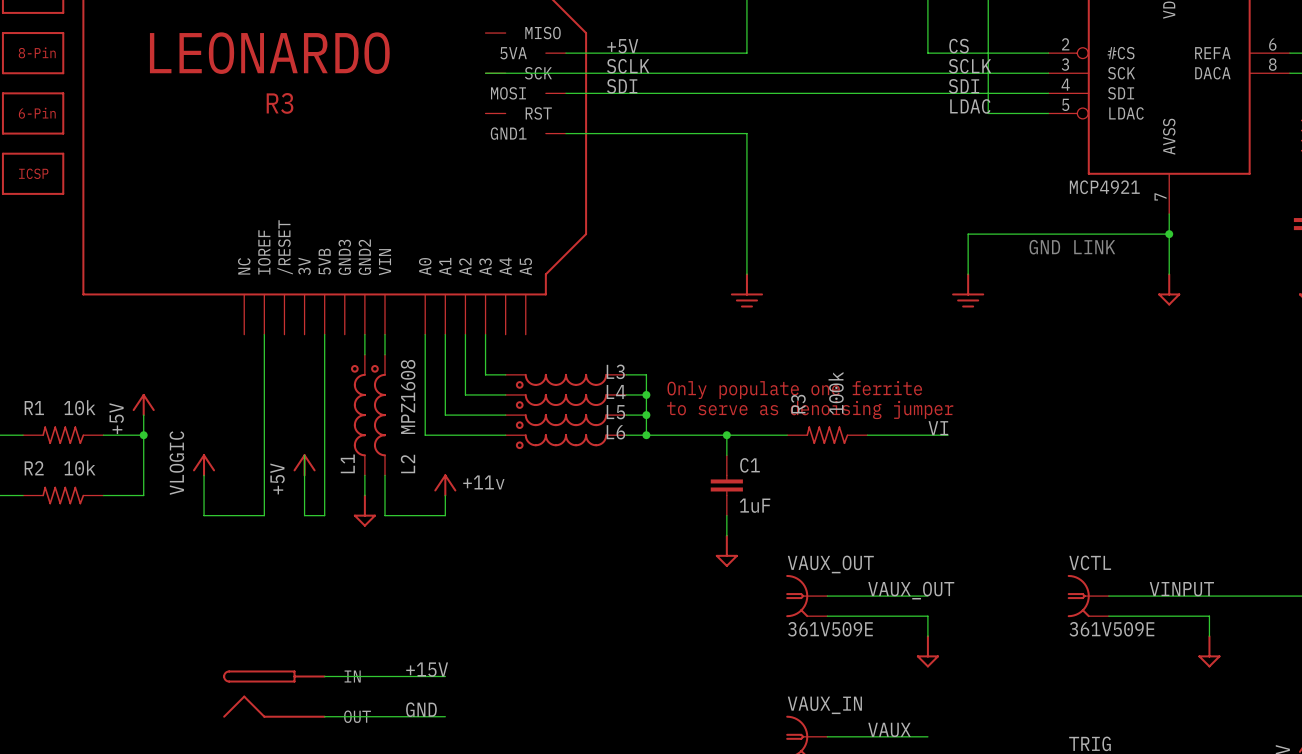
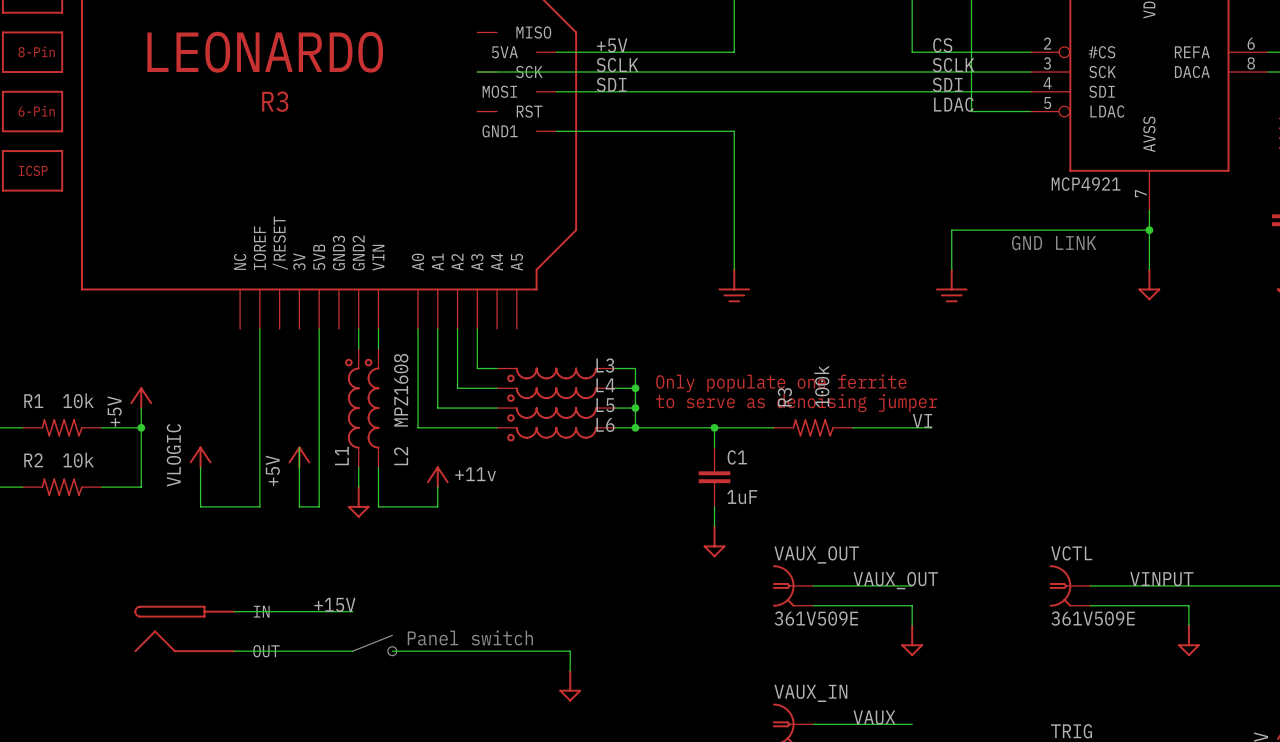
line: none -> (392, 635) (352, 651)
text: none -> Panel switch (470, 637)
drawing: none -> [387, 646, 398, 657]
wire: none -> (392, 651) (570, 651) (570, 670)
label position: +15V (427, 669) -> +15V (334, 604)
wire: (324, 676) (445, 676) -> (234, 651) (352, 651)
part position: (274, 694) -> (184, 628)
part: none -> (570, 685)
label: GND (421, 709) -> none
wire: (324, 716) (445, 716) -> (234, 611) (352, 611)

